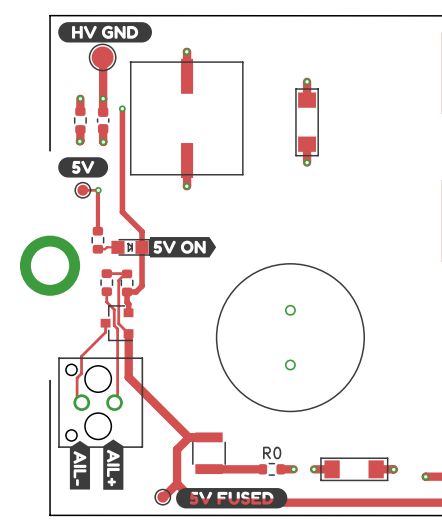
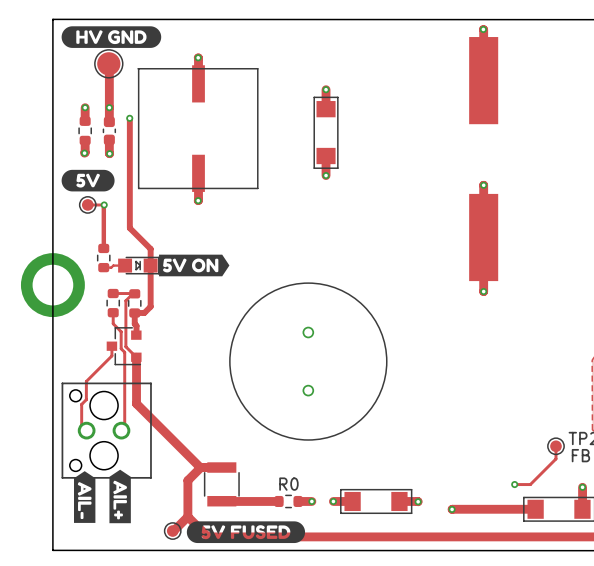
board edge: none -> (52, 163) (52, 407)

